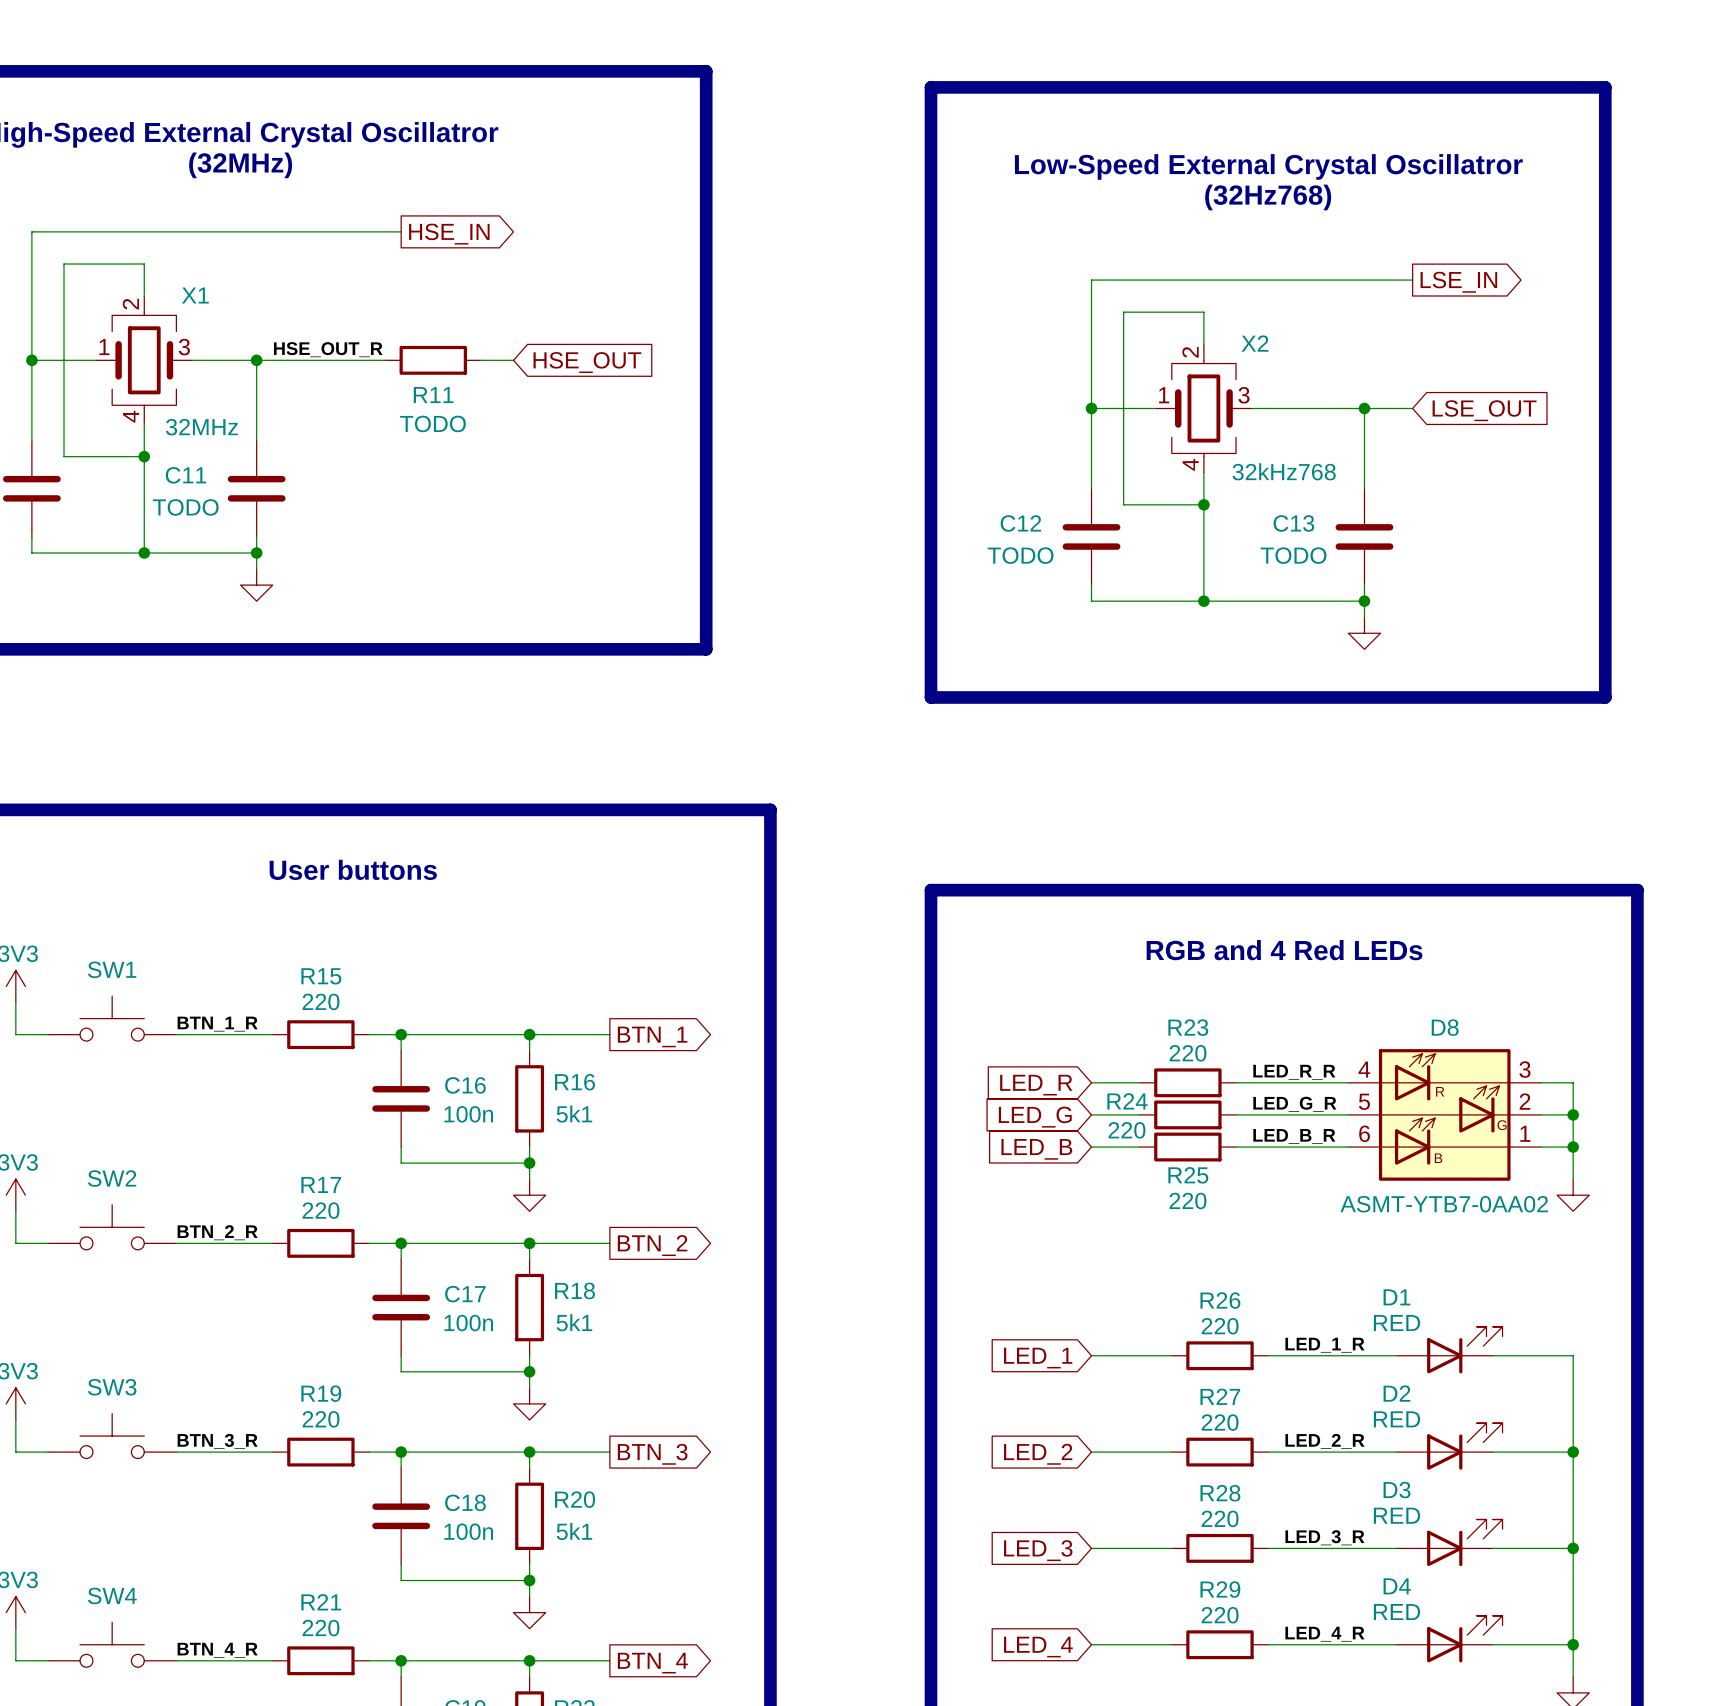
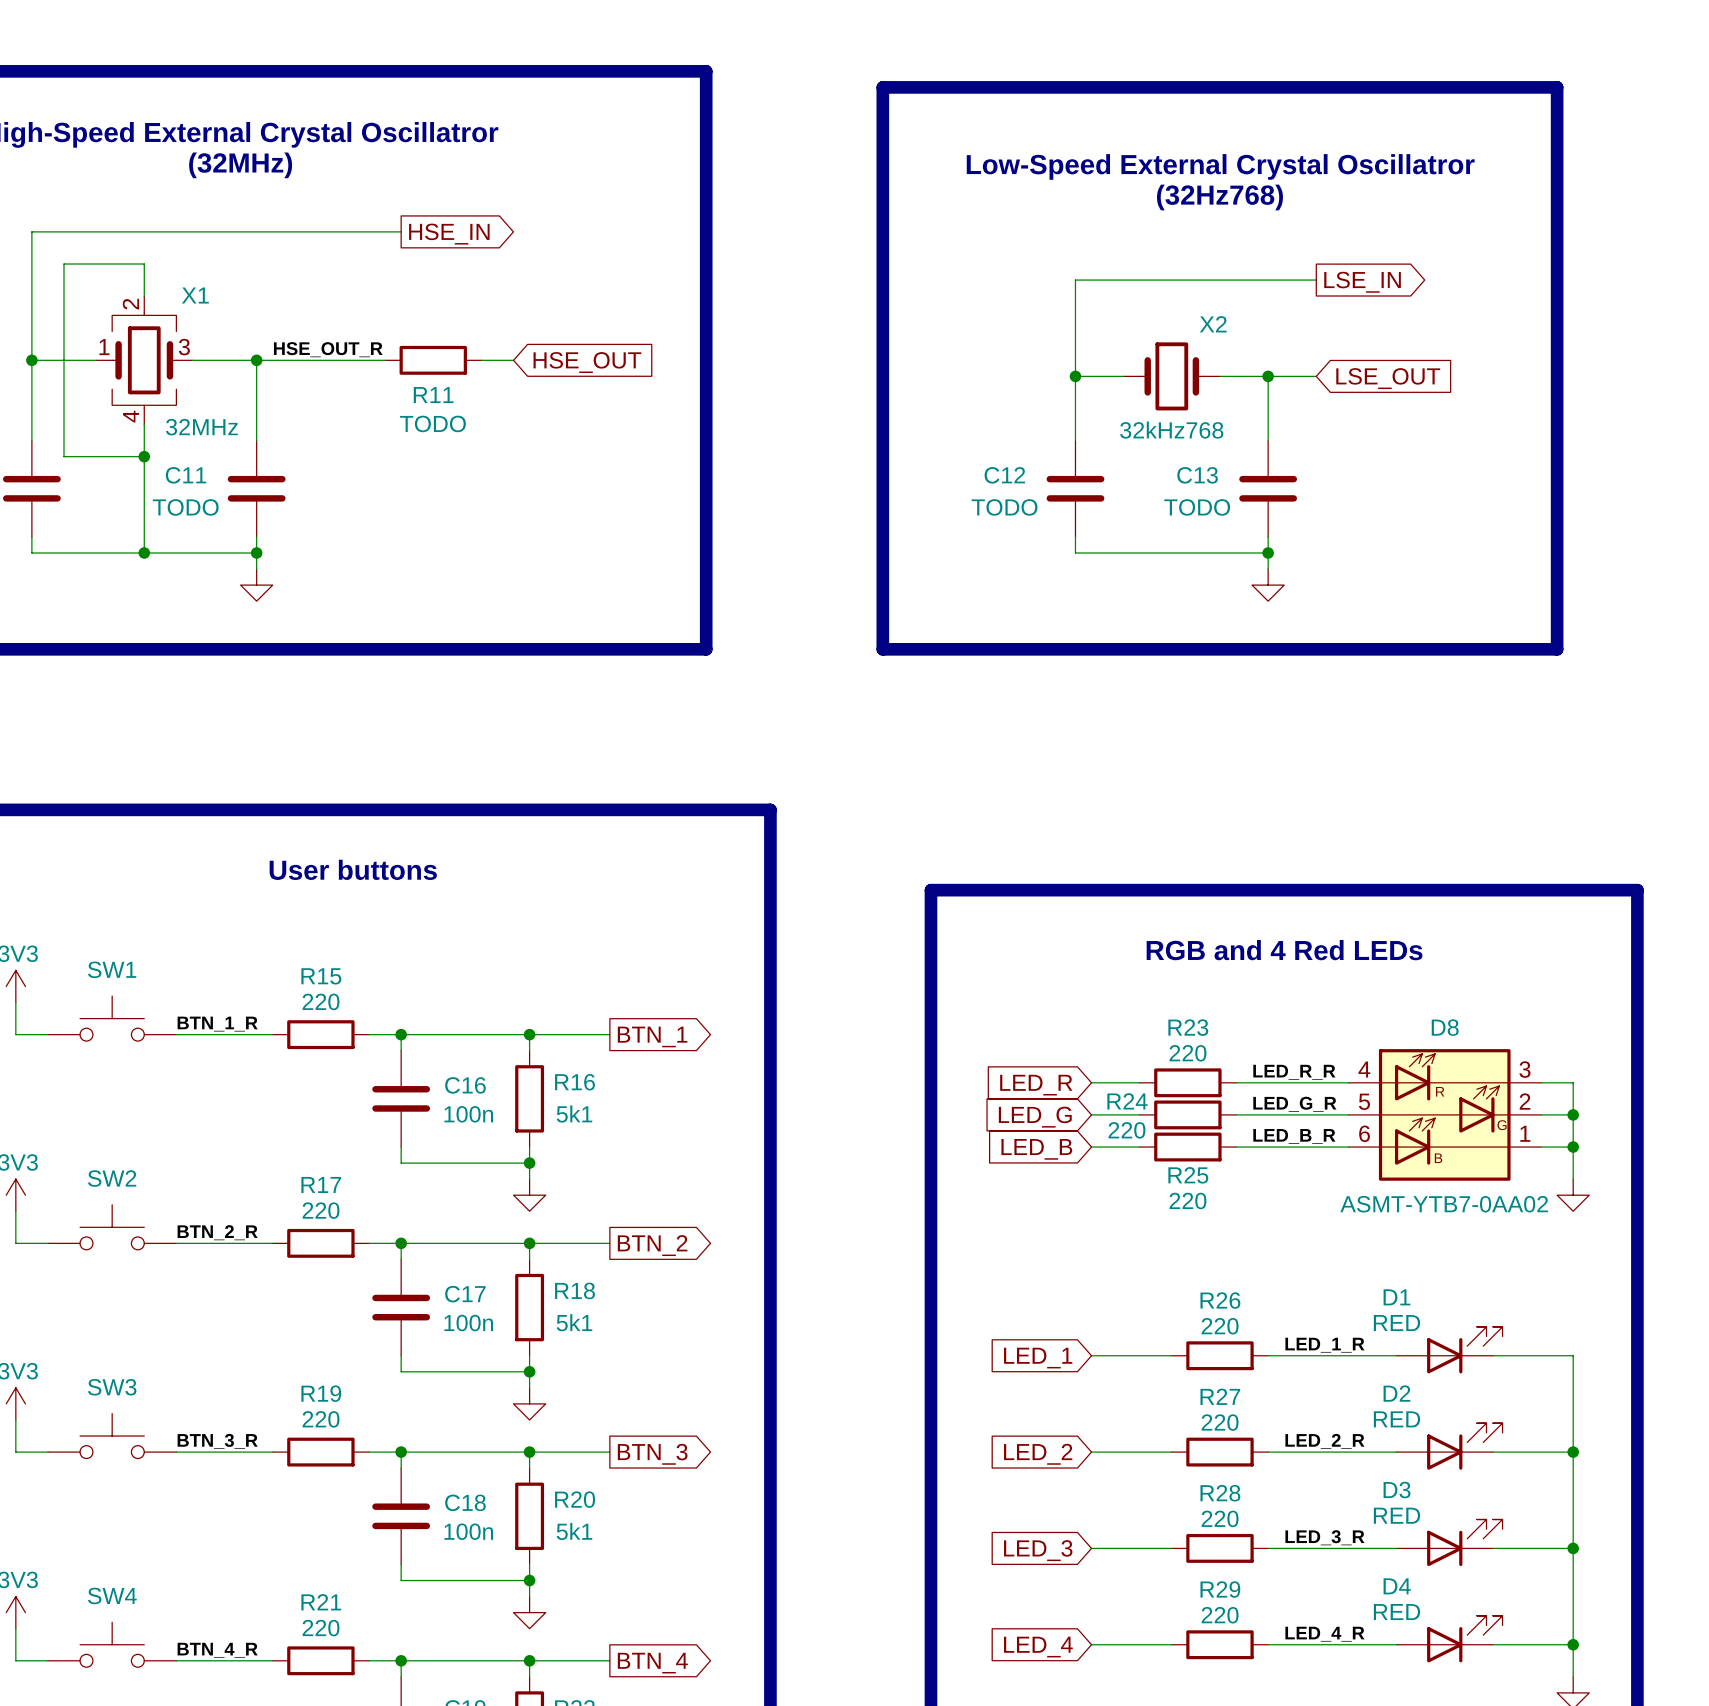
line: (930, 87) (930, 697) (1605, 697) (1605, 87) (1557, 87) -> (930, 87) (882, 87) (882, 649) (1557, 649) (1557, 87)
text position: Low-Speed External Crystal Oscillatror (1268, 166) -> Low-Speed External Crystal Oscillatror (1220, 166)
text position: (32Hz768) (1268, 197) -> (32Hz768) (1219, 197)
wire: (1091, 280) (1091, 488) -> (1091, 280) (1075, 280) (1075, 440)
wire: (1316, 280) (1412, 280) -> (1219, 376) (1316, 376)
global label position: LSE_IN (1458, 282) -> LSE_IN (1362, 282)
X2 symbol: [1155, 344, 1253, 473] -> [1123, 342, 1220, 411]
wire: (1203, 344) (1203, 312) (1123, 312) (1123, 504) (1203, 504) -> none
wire: none -> (1075, 376) (1123, 376)
wire: none -> (1268, 376) (1268, 440)
junction: none -> (1268, 376)
wire: (1091, 408) (1155, 408) -> none
junction position: (1091, 408) -> (1075, 376)
wire: (1252, 408) (1412, 408) -> none
wire: (1364, 408) (1364, 488) -> none
junction: (1364, 408) -> none
global label position: LSE_OUT (1484, 410) -> LSE_OUT (1388, 378)
X2 value position: 32kHz768 (1284, 471) -> 32kHz768 (1171, 430)
wire: (1203, 472) (1203, 601) -> none
junction: (1203, 504) -> none
wire: none -> (1075, 536) (1075, 552) (1268, 552)
C12 position: (1091, 536) -> (1075, 488)
C13 position: (1364, 536) -> (1268, 488)
junction: none -> (1268, 552)
wire: (1091, 585) (1091, 601) (1364, 601) -> none
wire: (1364, 585) (1364, 617) -> (1268, 536) (1268, 569)
junction: (1203, 601) -> none
junction: (1364, 601) -> none
power symbol position: (1364, 633) -> (1268, 585)

